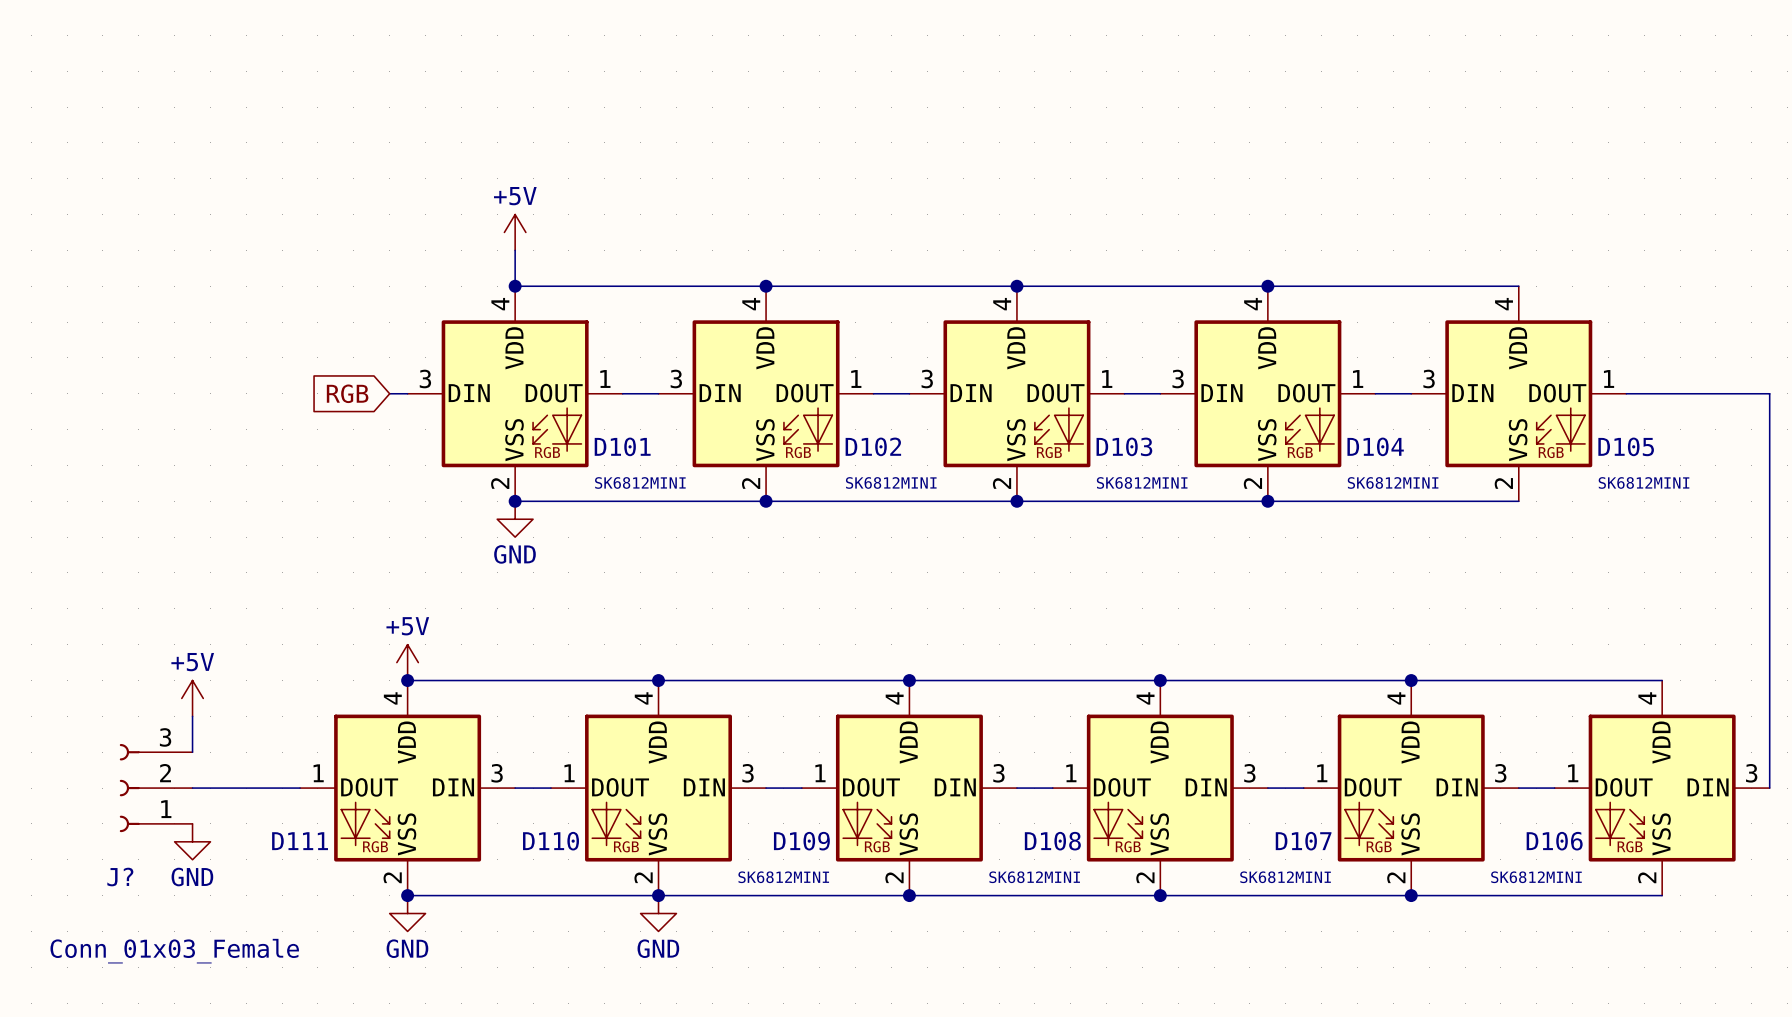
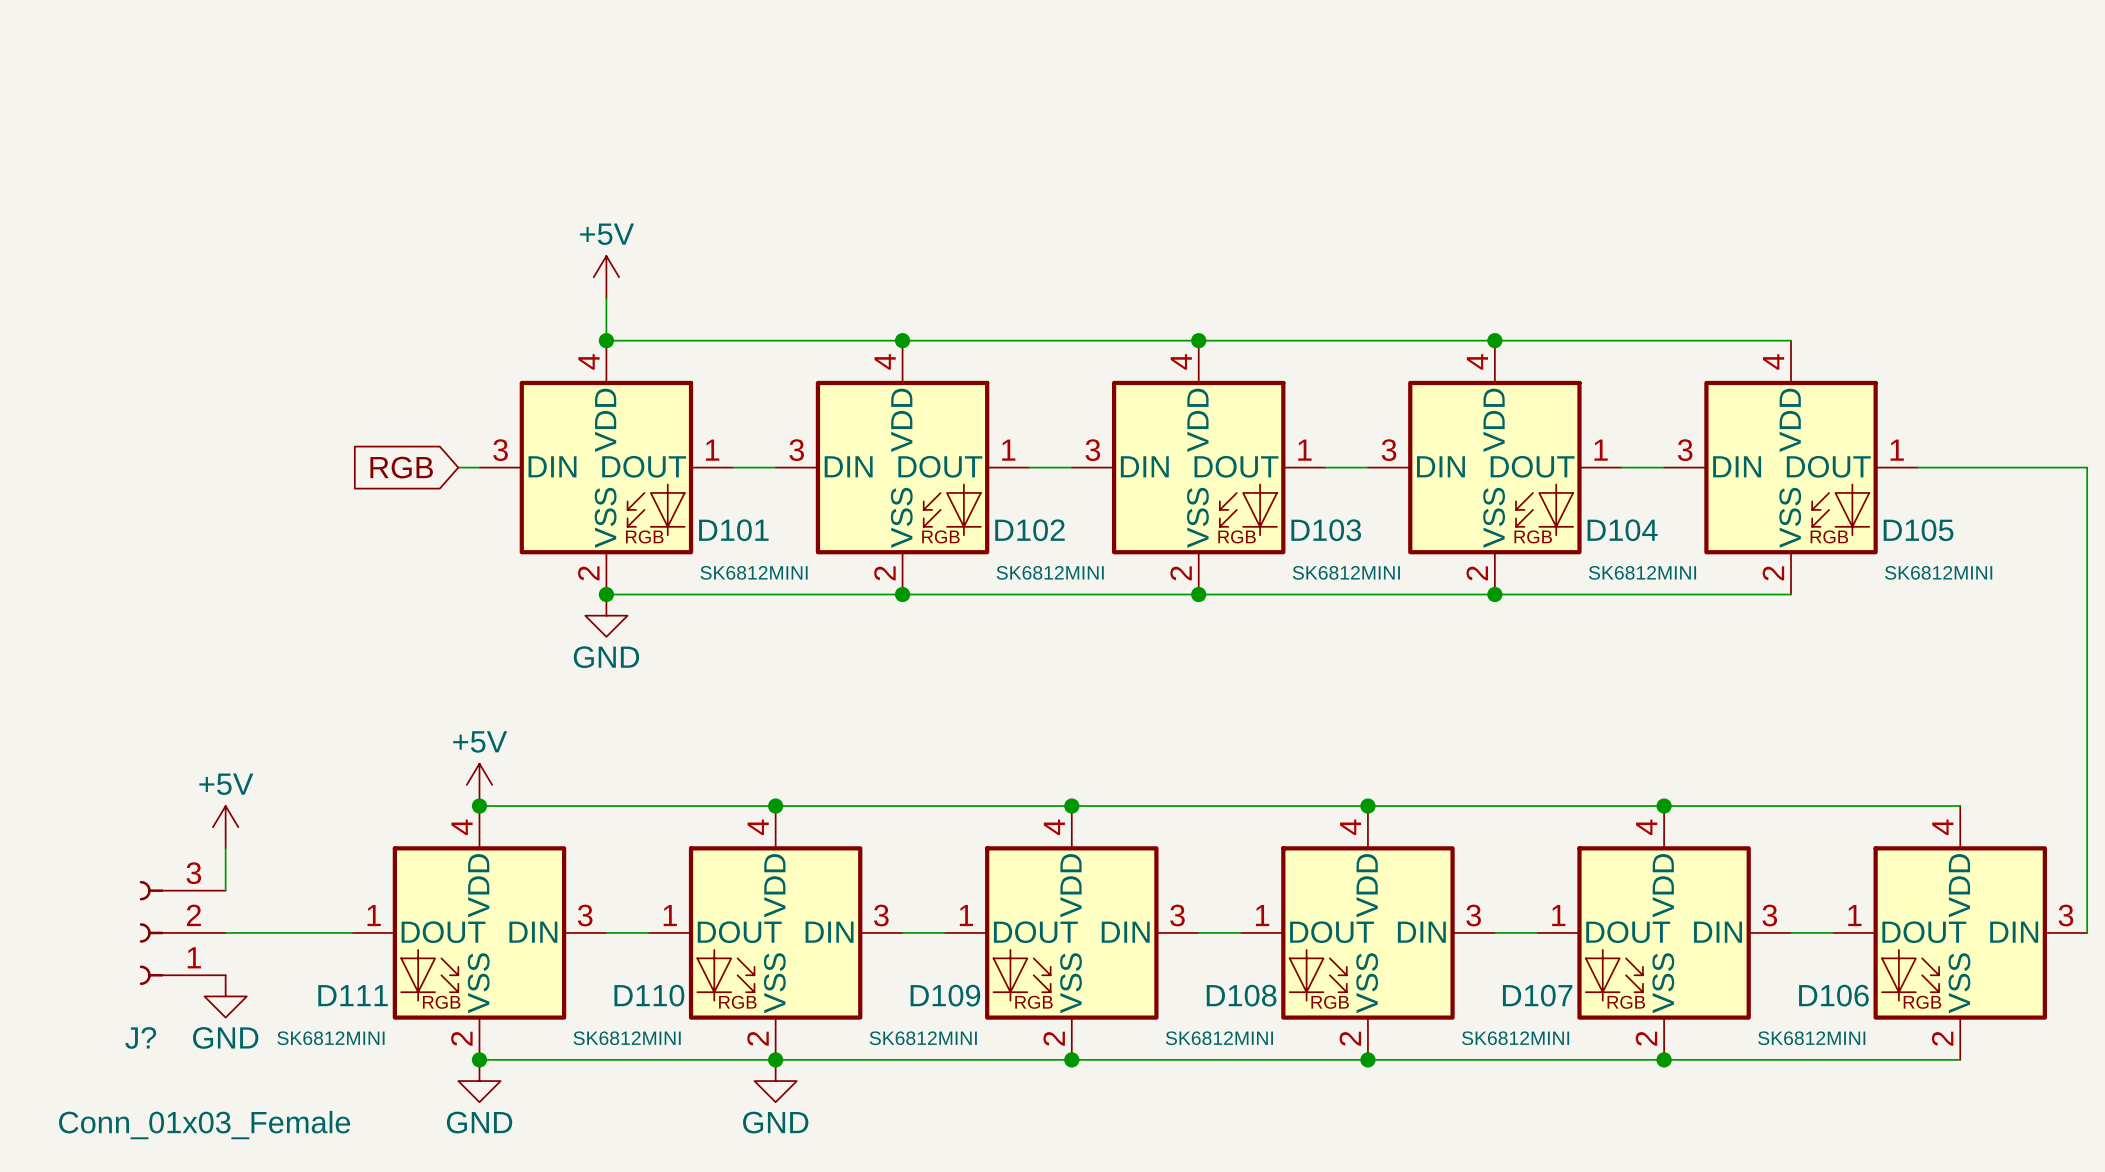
D111 value: none -> SK6812MINI (330, 1038)
D110 value: none -> SK6812MINI (627, 1038)

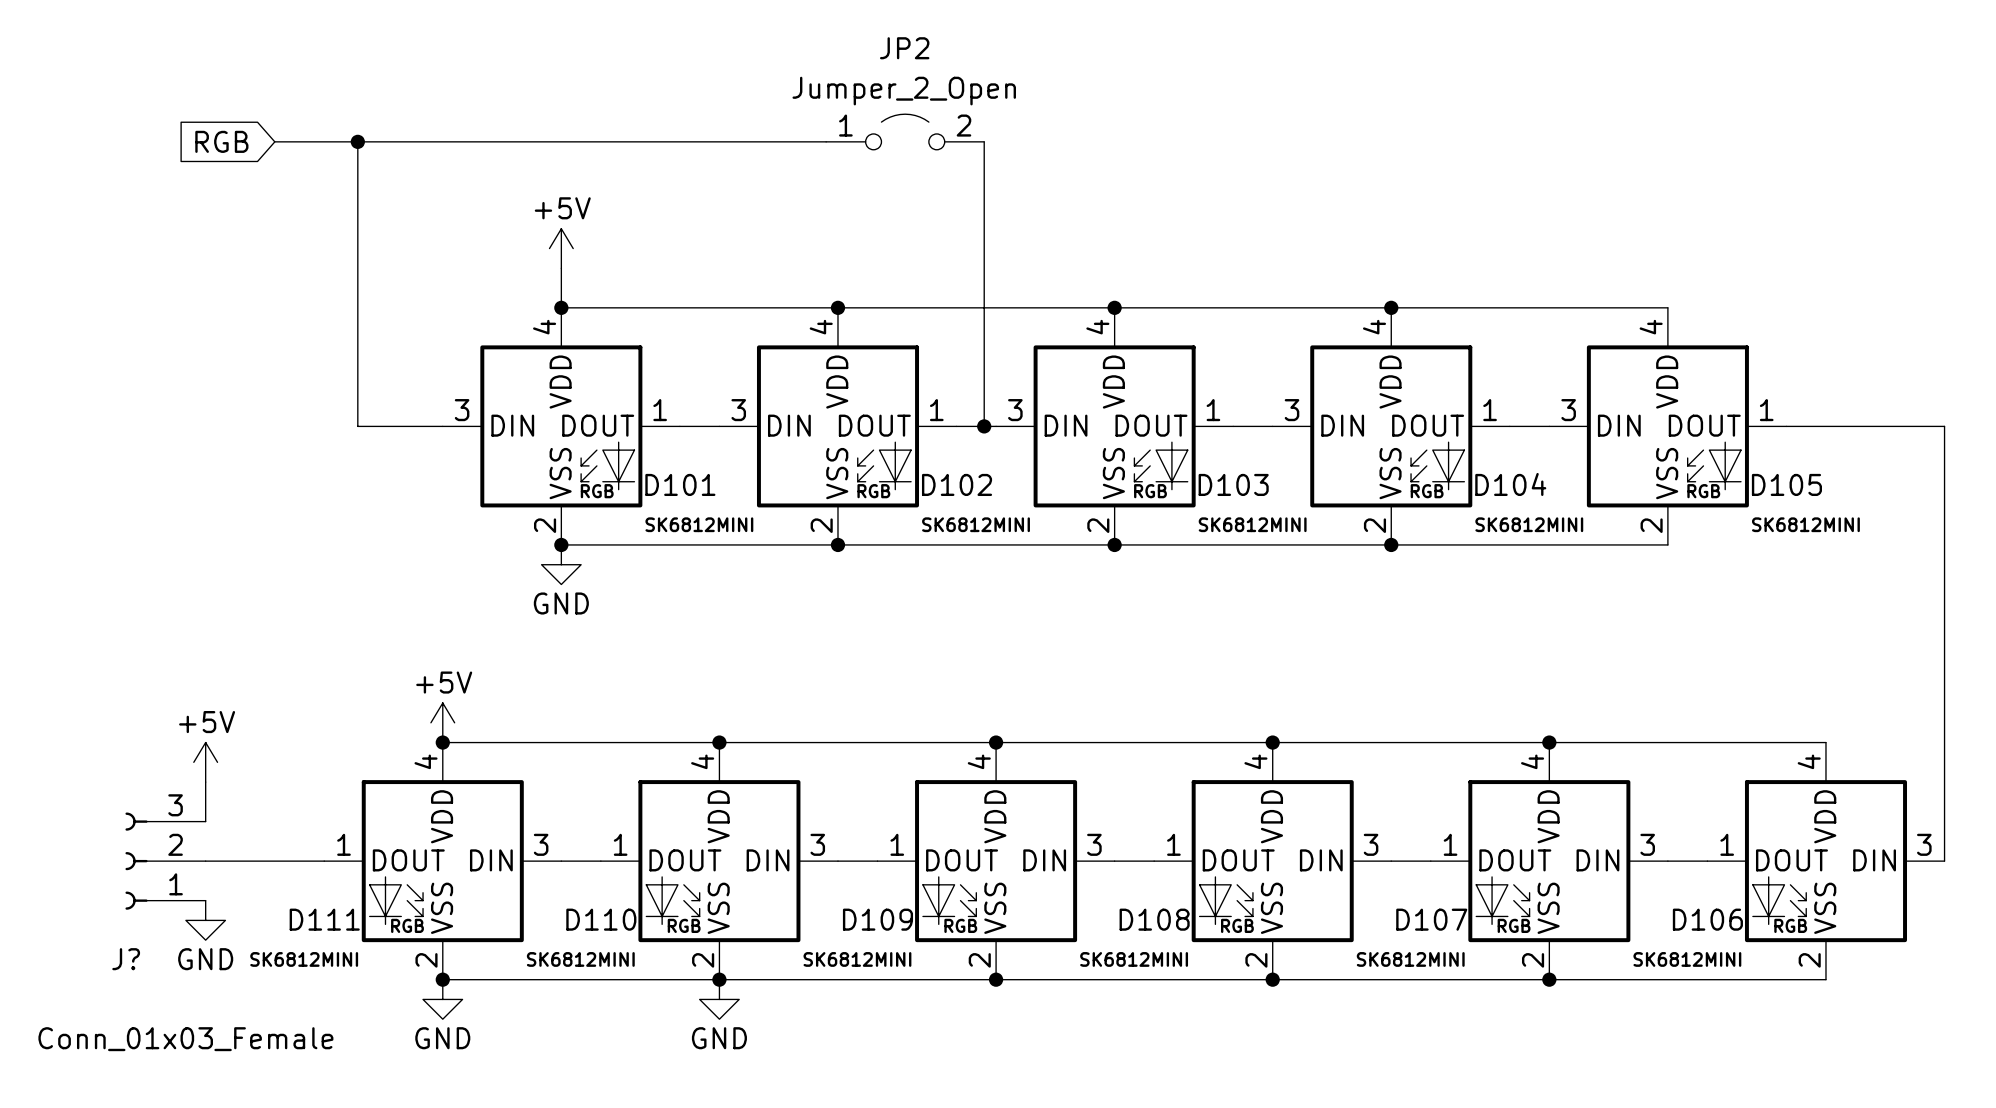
JP2: none -> Jumper_2_Open (905, 131)
wire: none -> (274, 141) (826, 141)
wire: none -> (357, 141) (357, 426) (423, 426)
junction: none -> (357, 141)
wire: none -> (984, 141) (984, 426)
global label position: RGB (401, 467) -> RGB (221, 141)
junction: none -> (984, 426)

